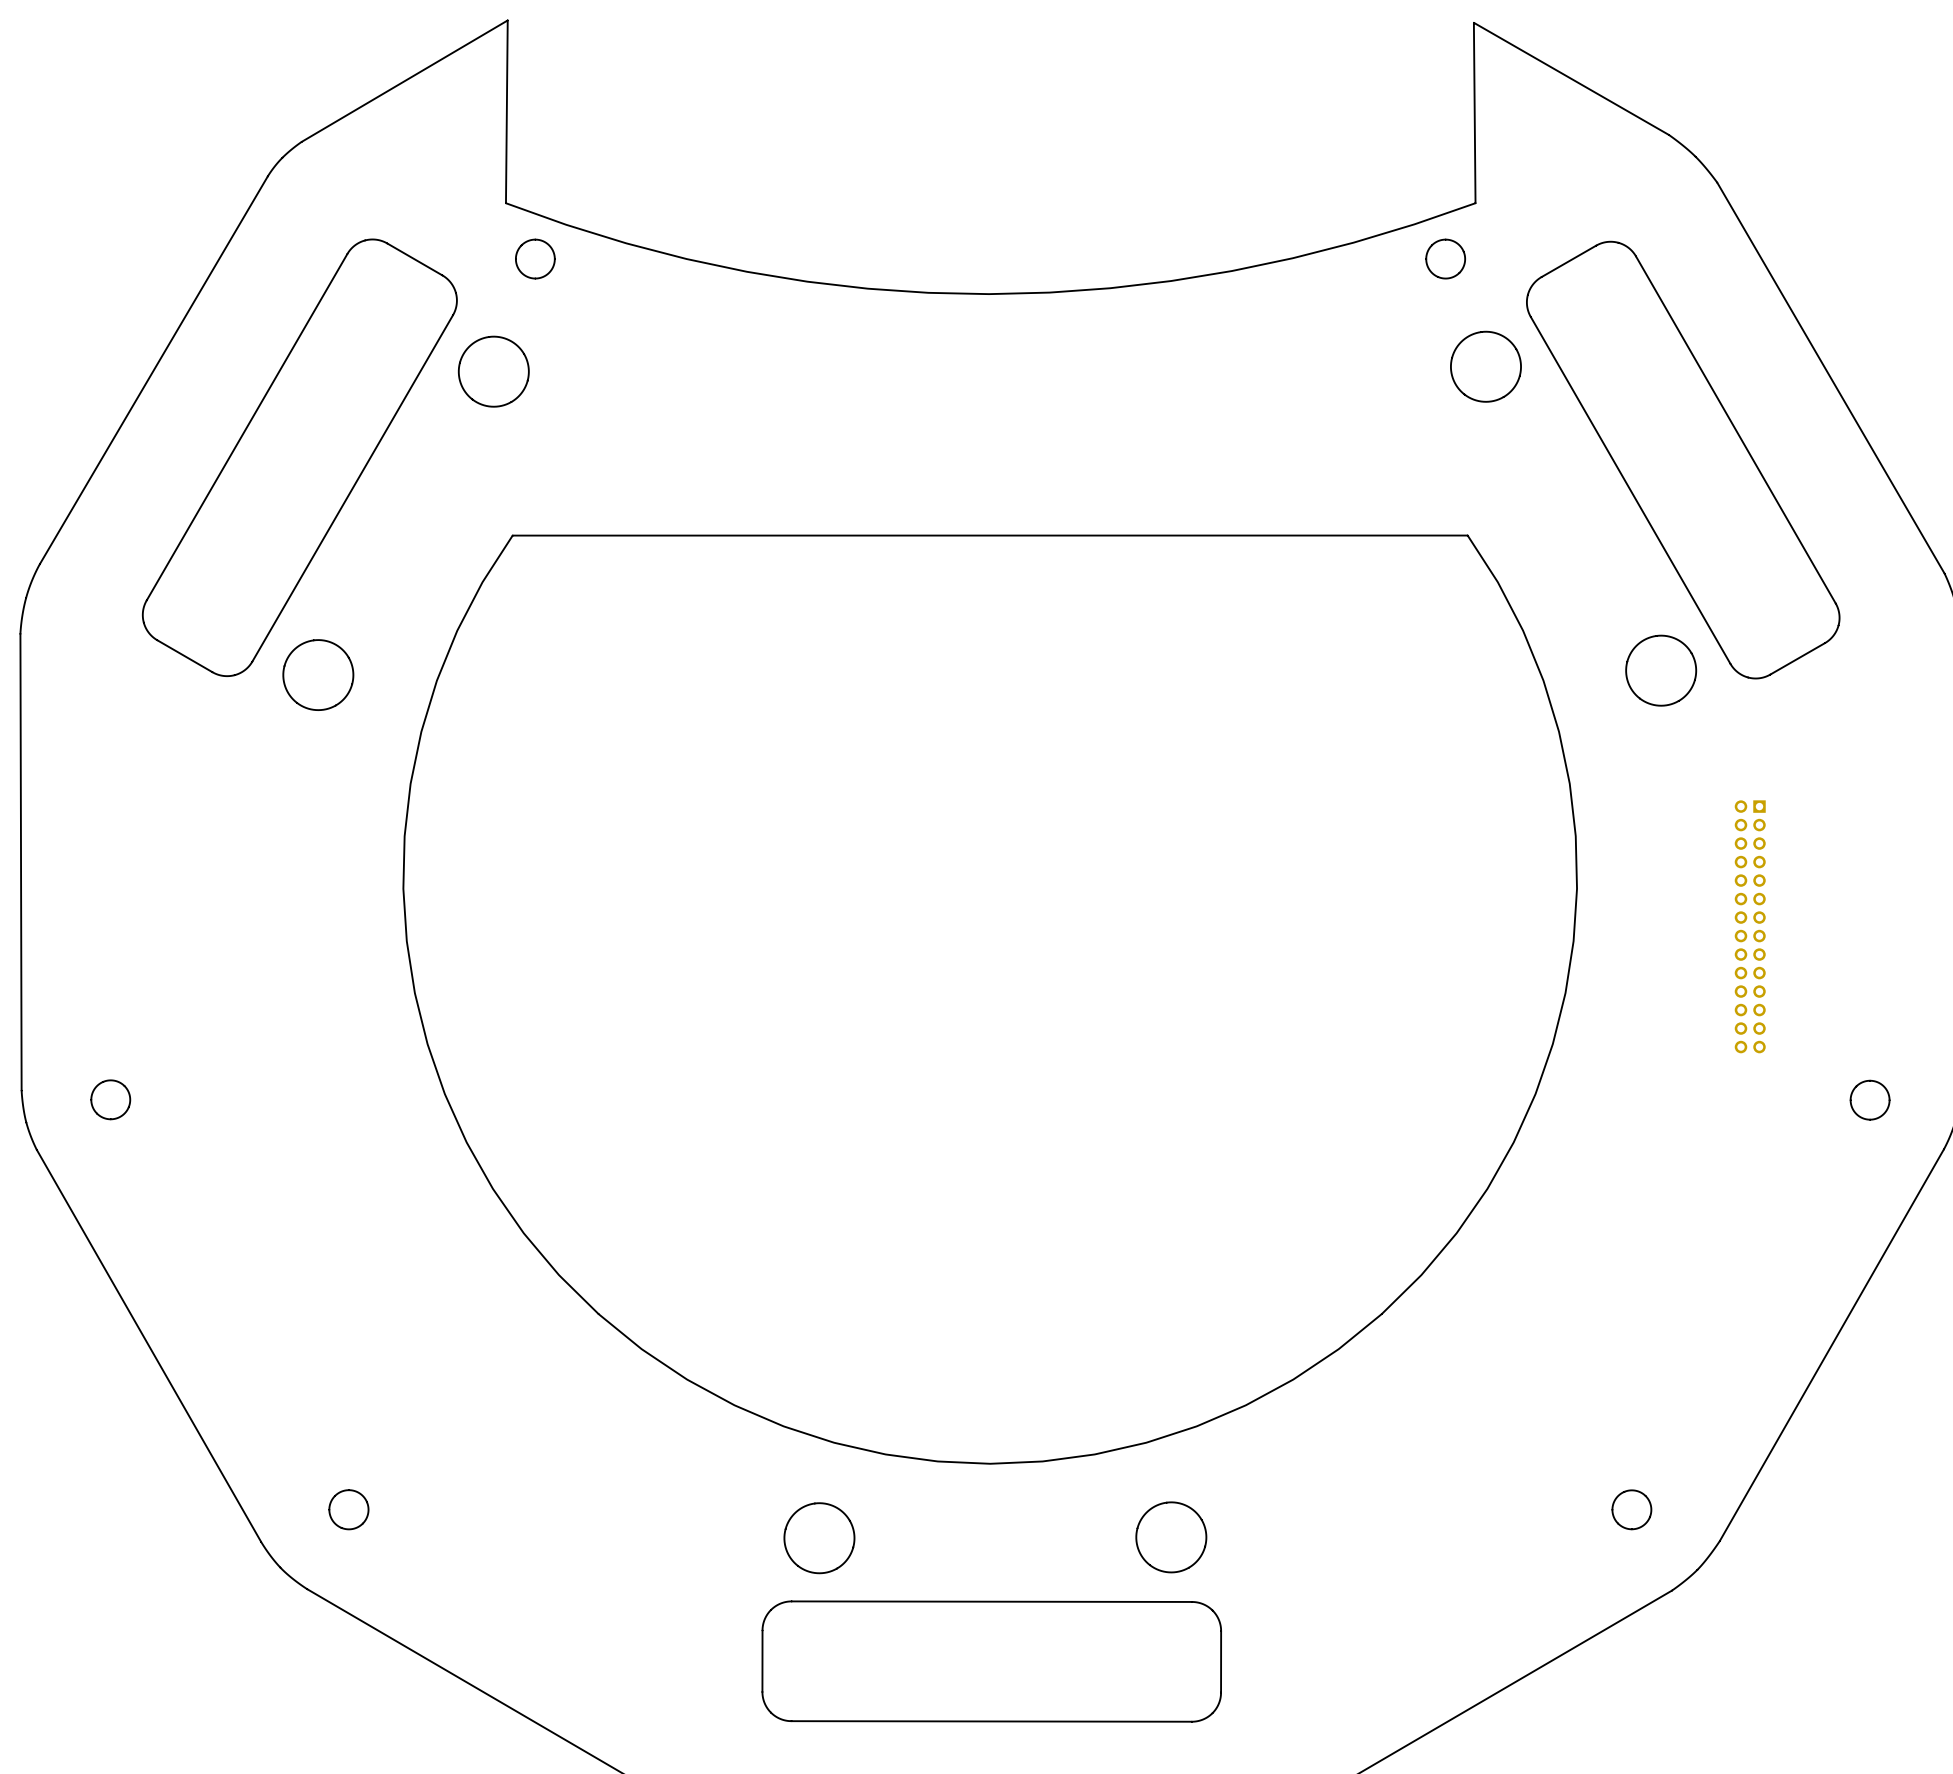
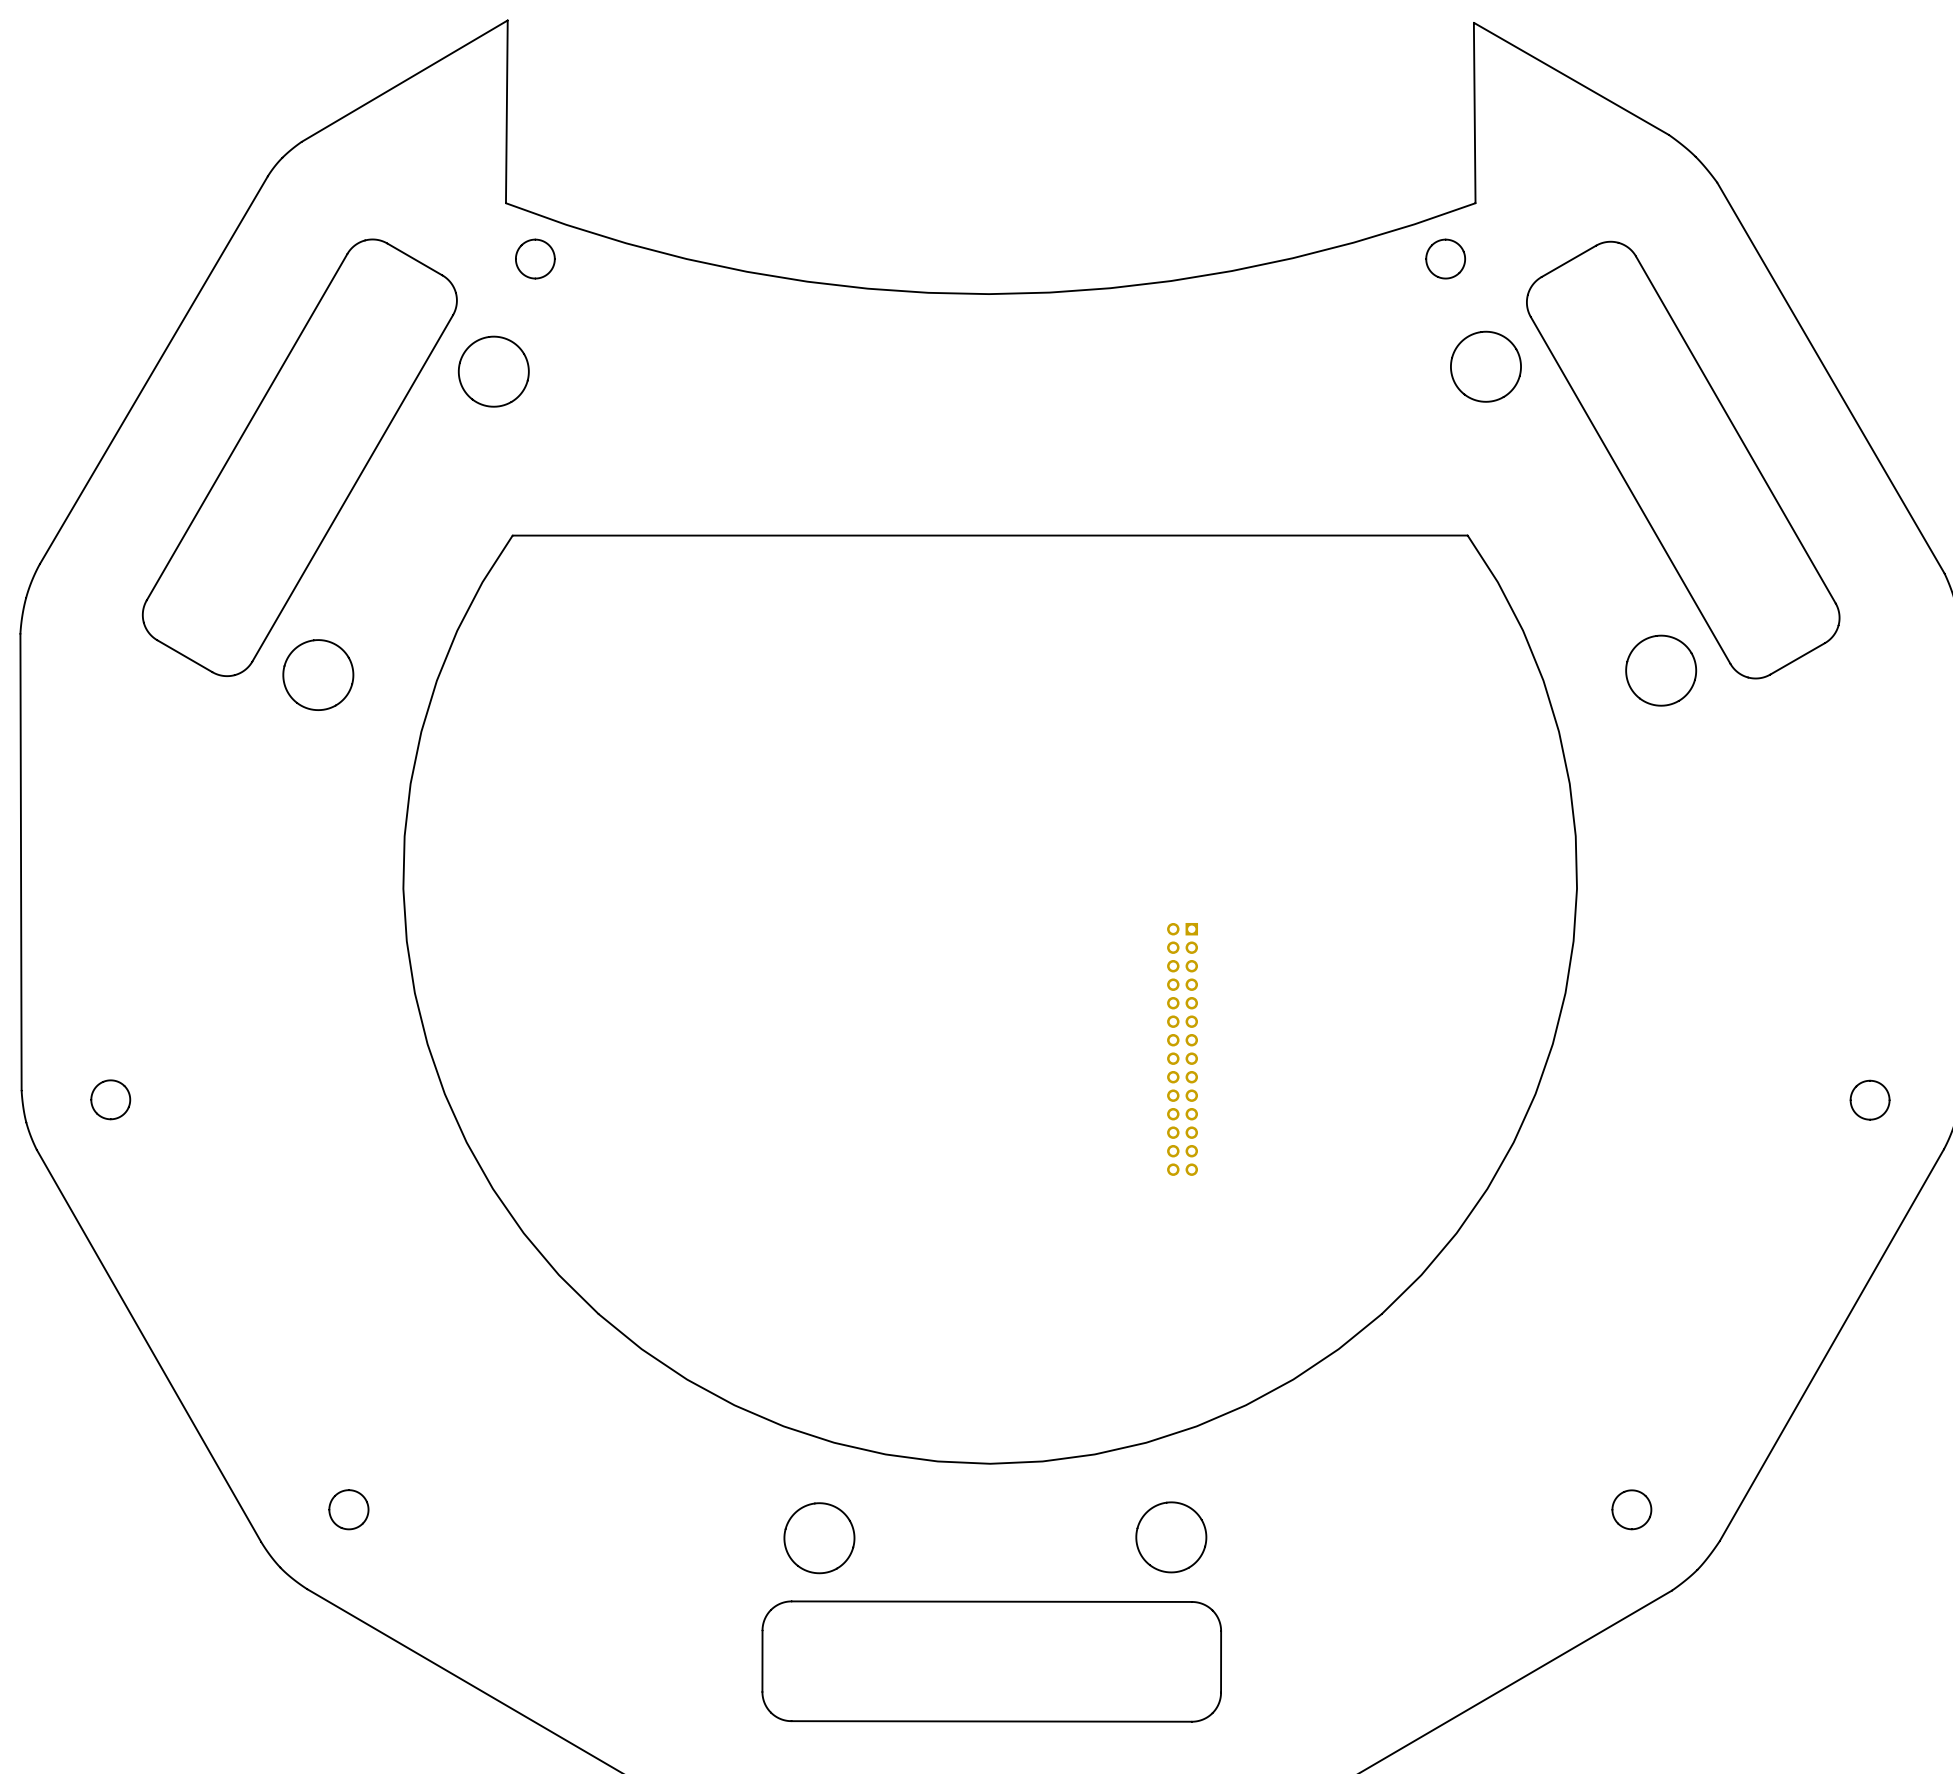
part: (1750, 926) -> none
part: none -> (1182, 1049)

